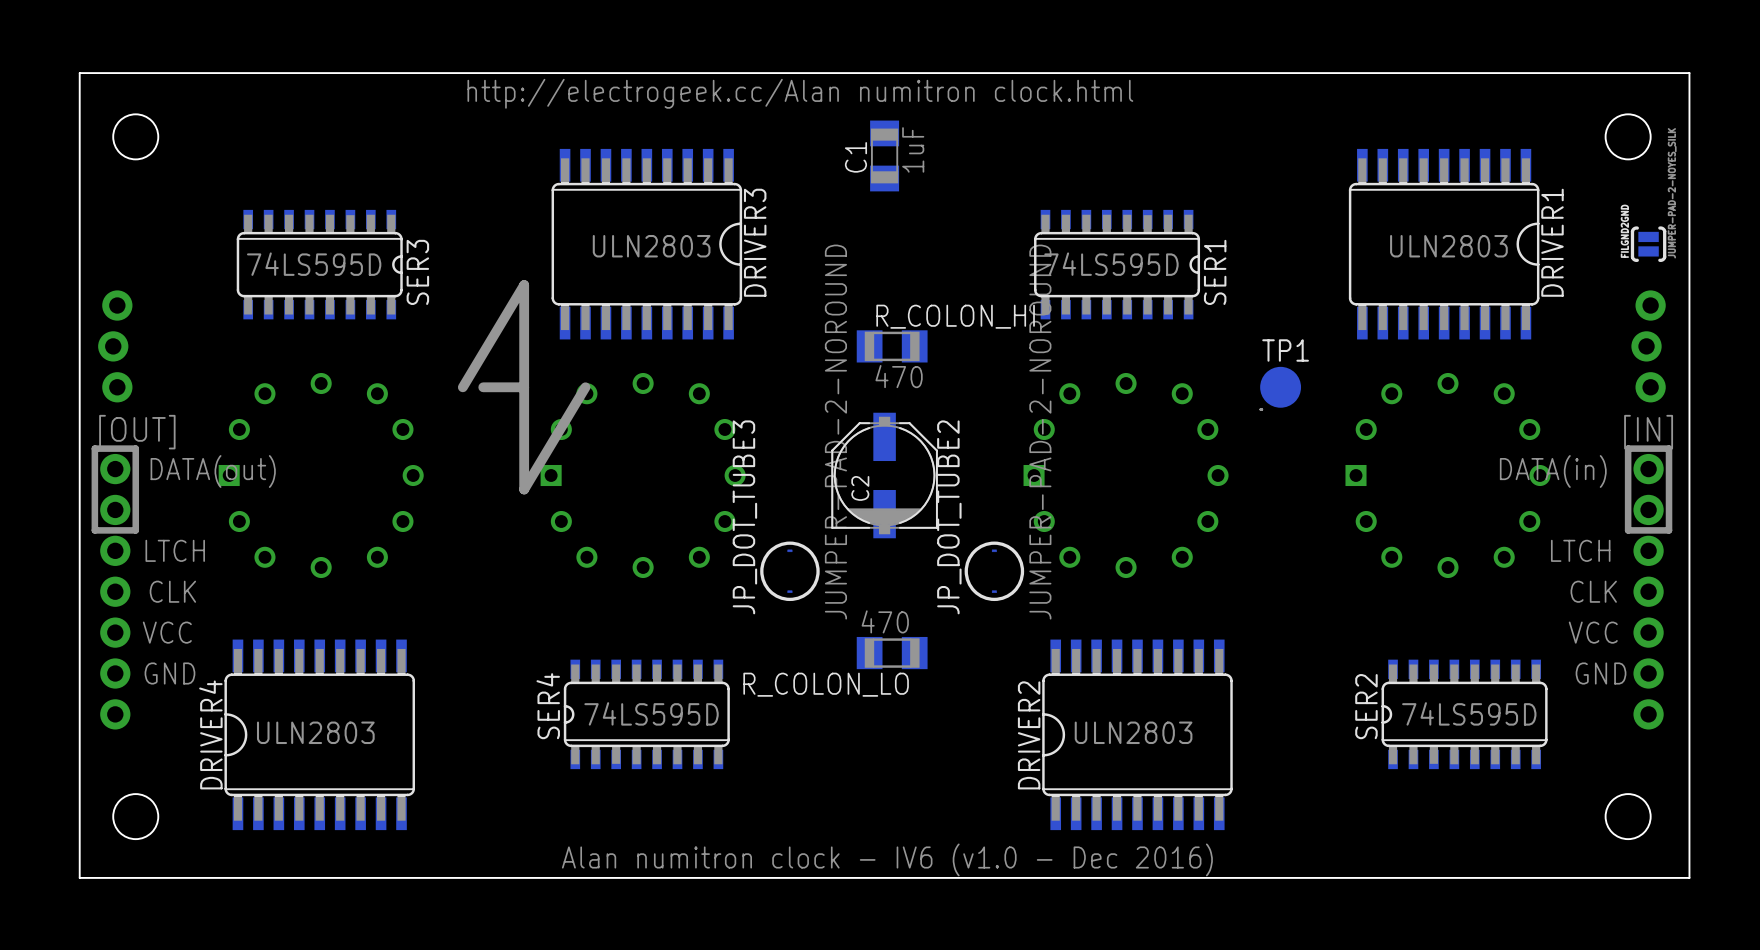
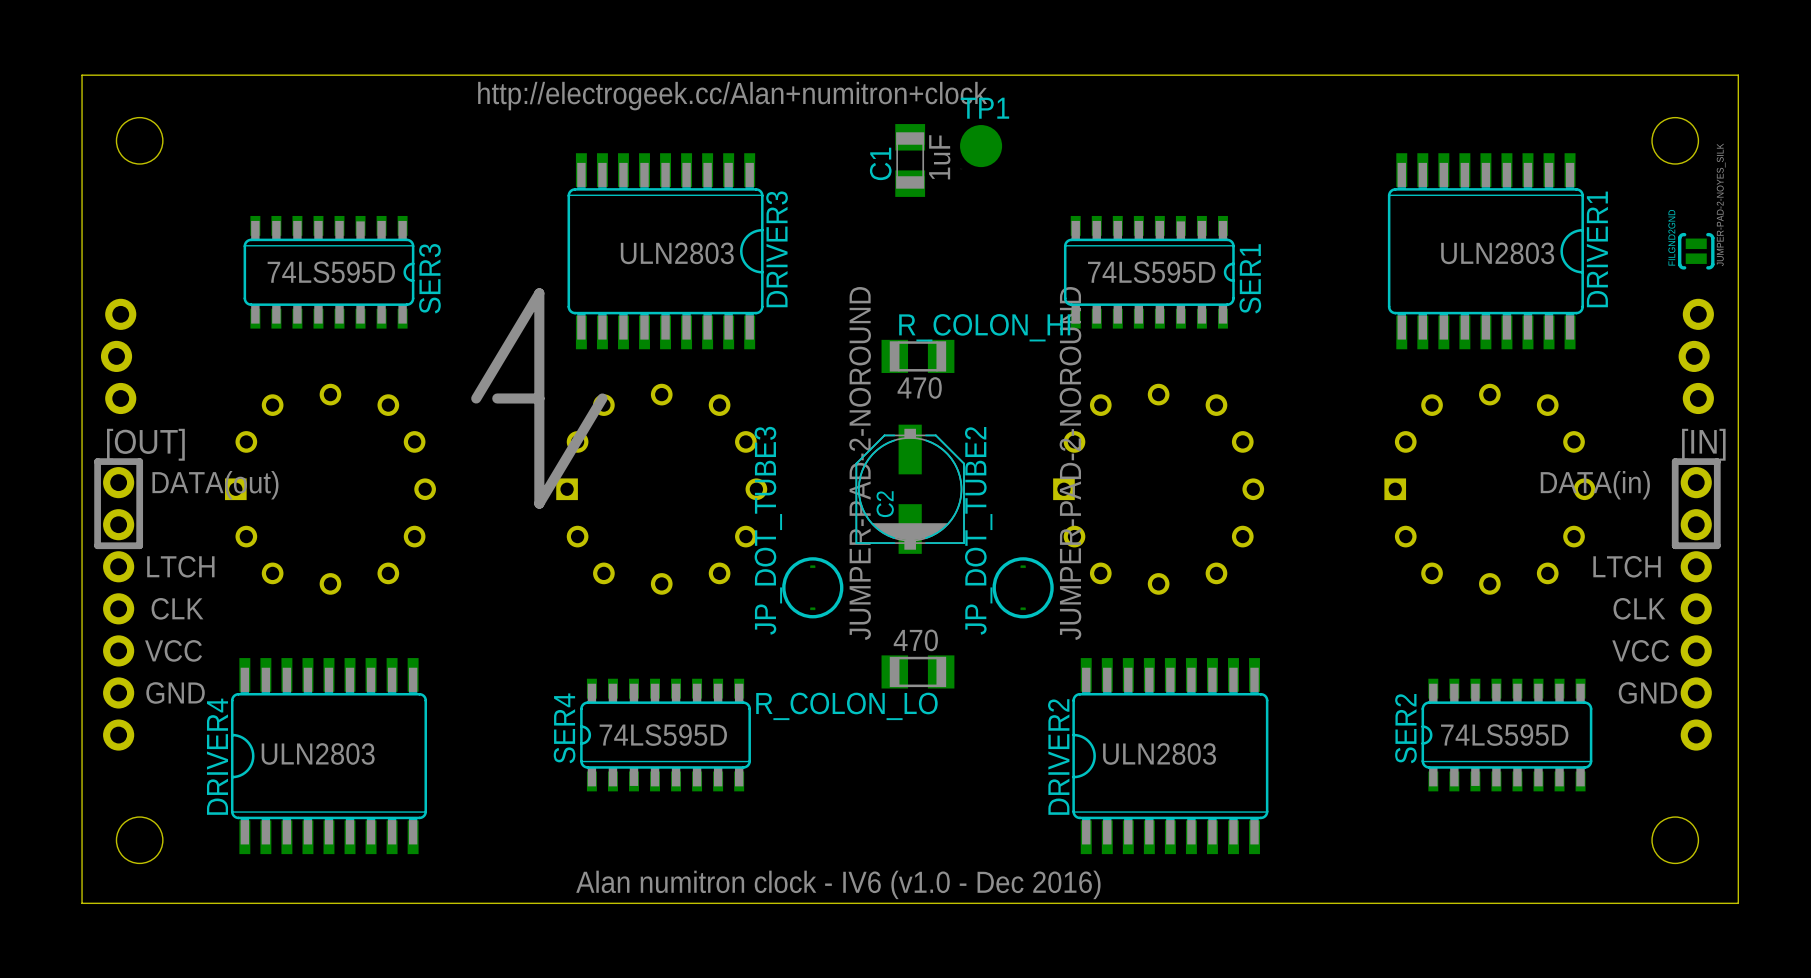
text: http://electrogeek.cc/Alan numitron clock.html (800, 93) -> http://electrogeek.cc/Alan+numitron+clock (732, 96)
TP1 position: (1280, 387) -> (981, 146)

